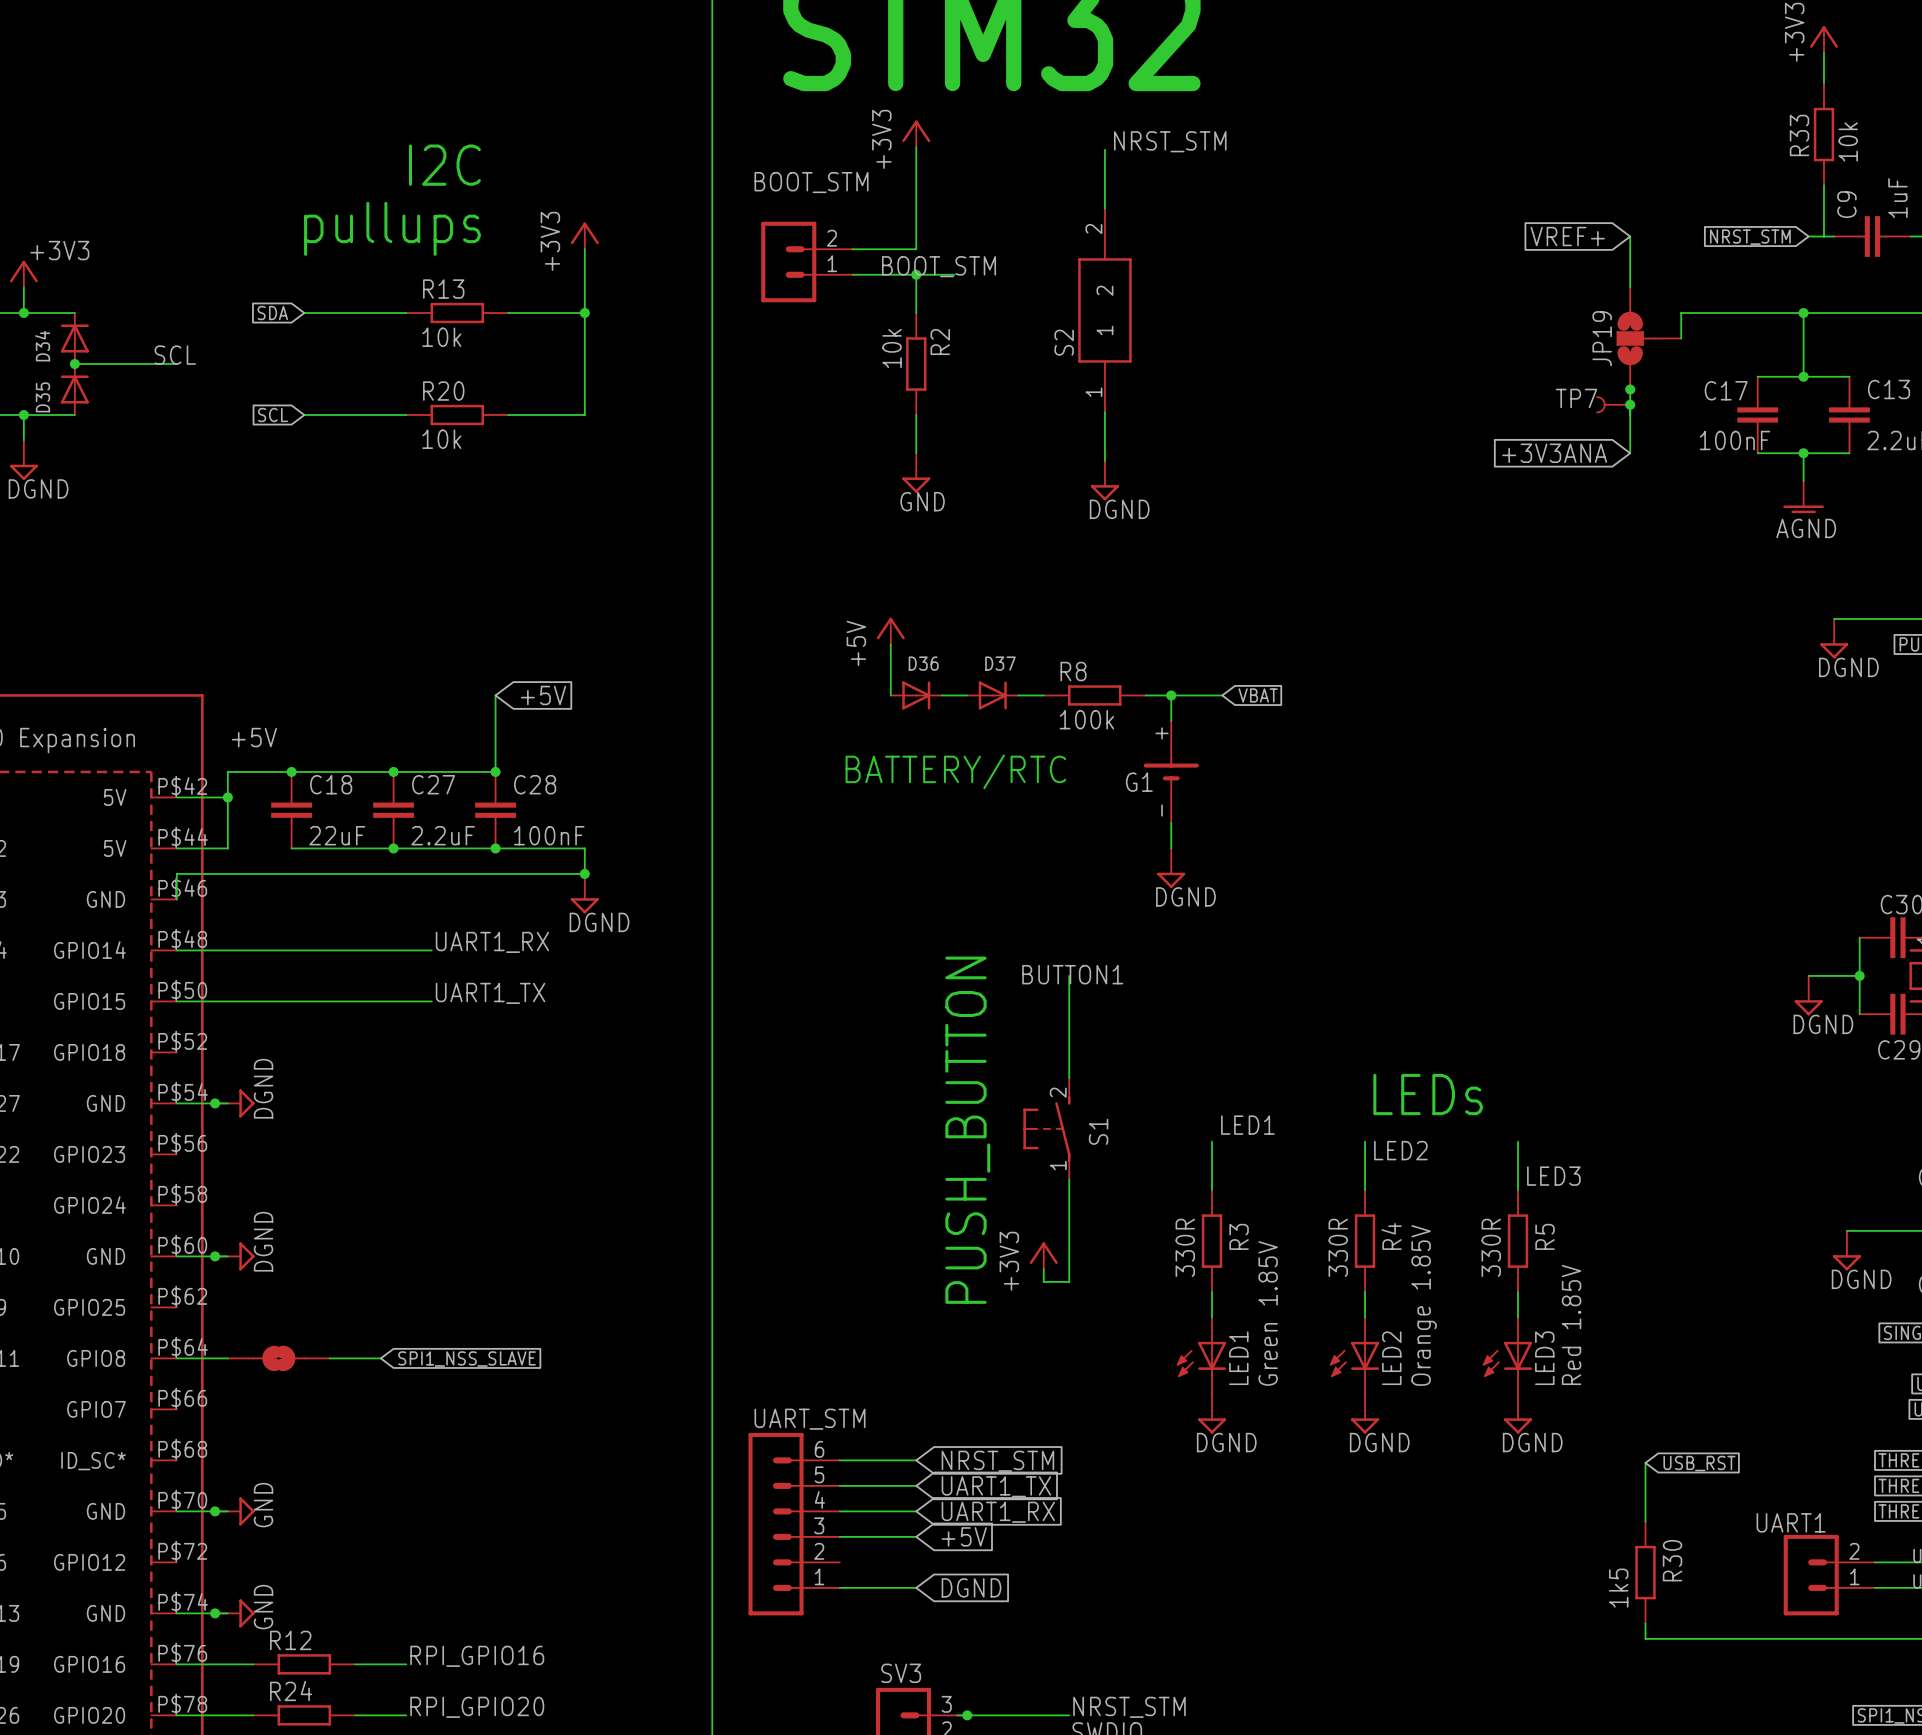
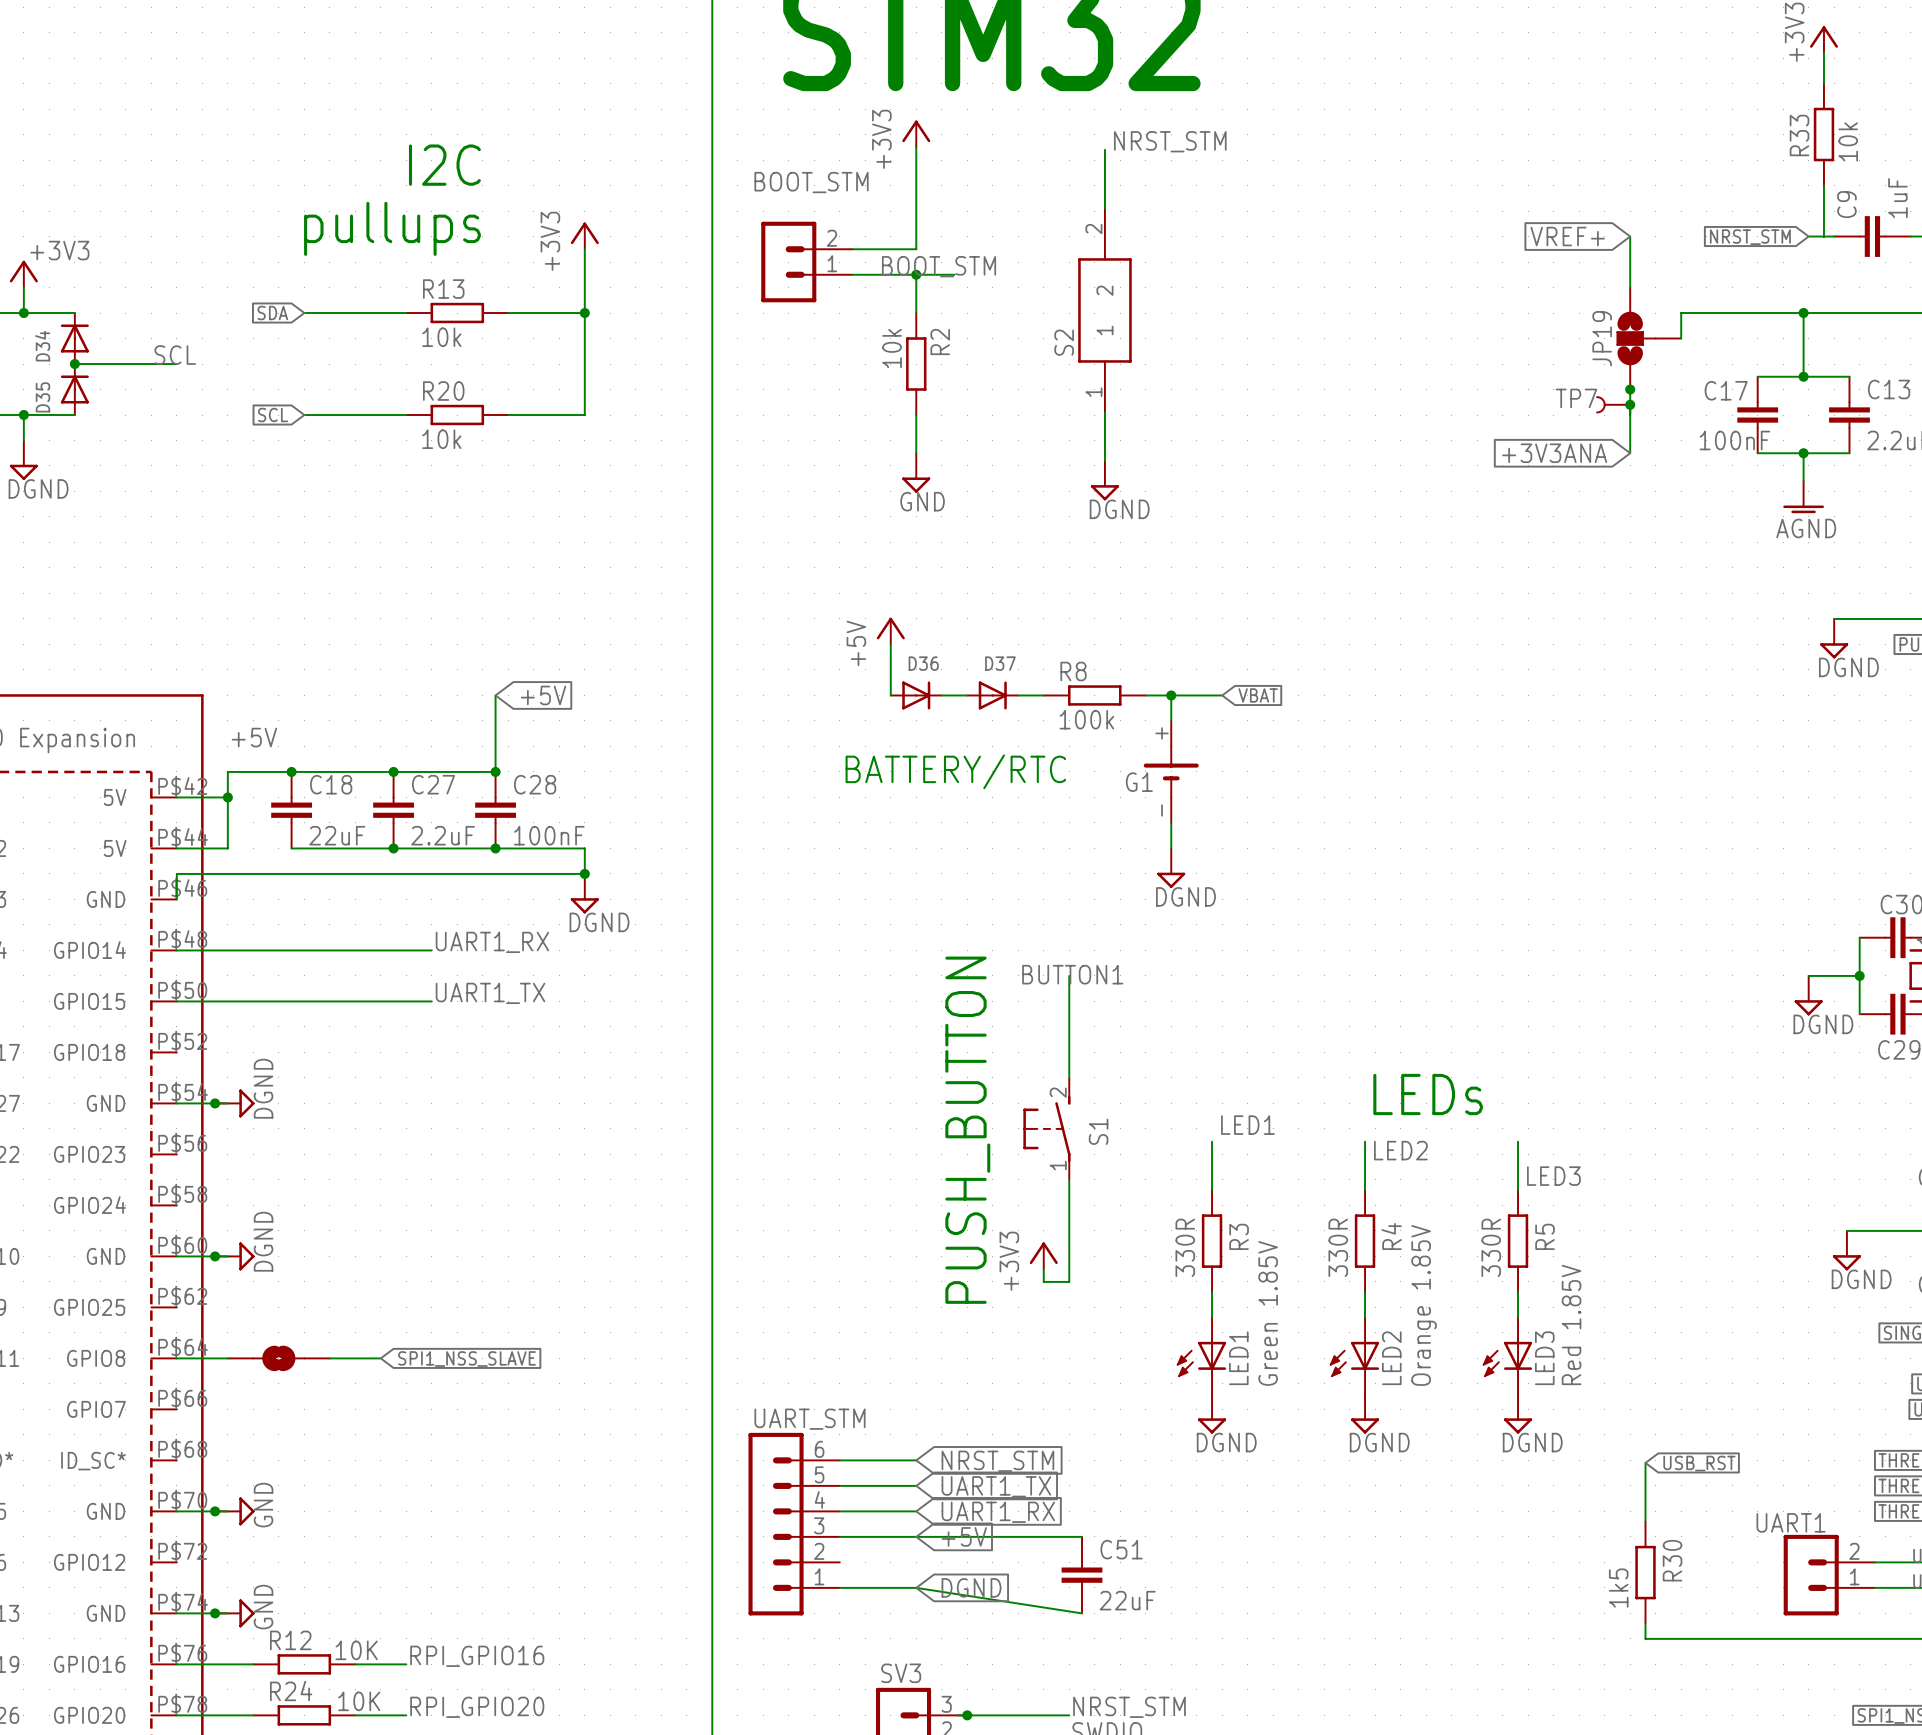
wire: none -> (916, 1536) (1082, 1536)
C51: none -> 22uF (1082, 1575)
wire: none -> (916, 1587) (1082, 1613)
R12 value: none -> 10K (356, 1650)
R24 value: none -> 10K (359, 1701)

